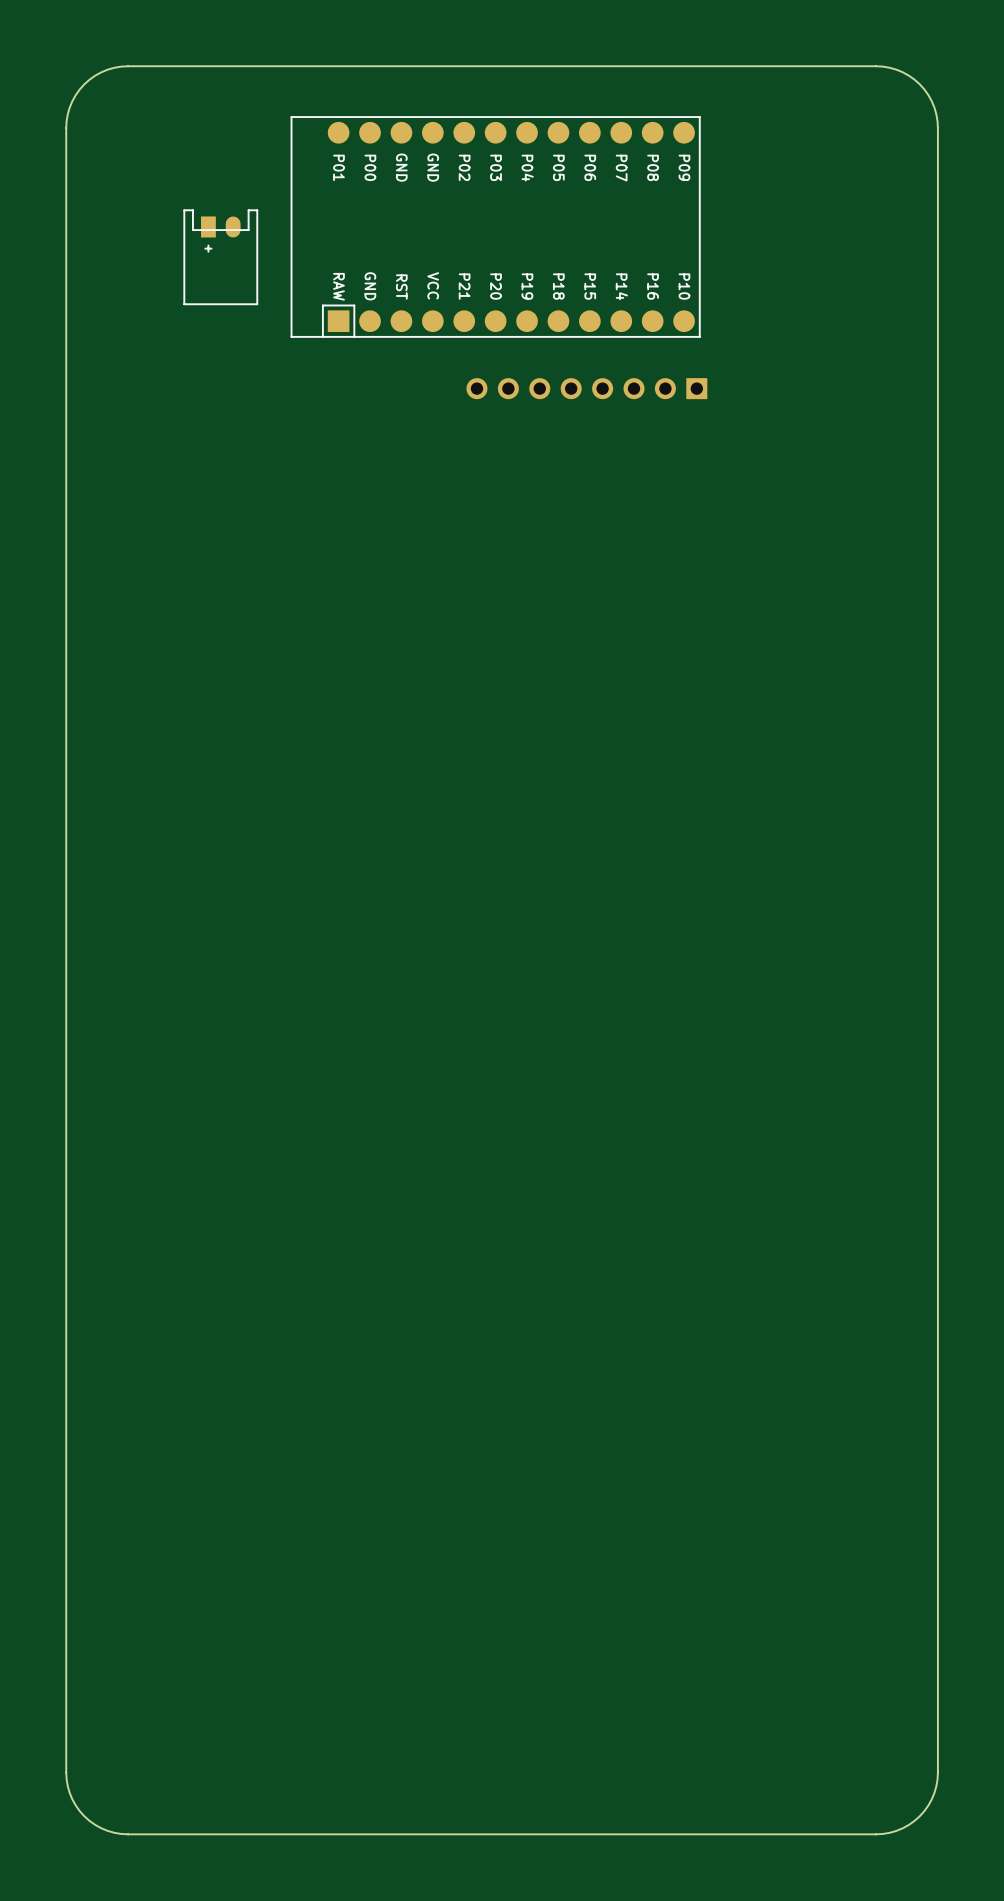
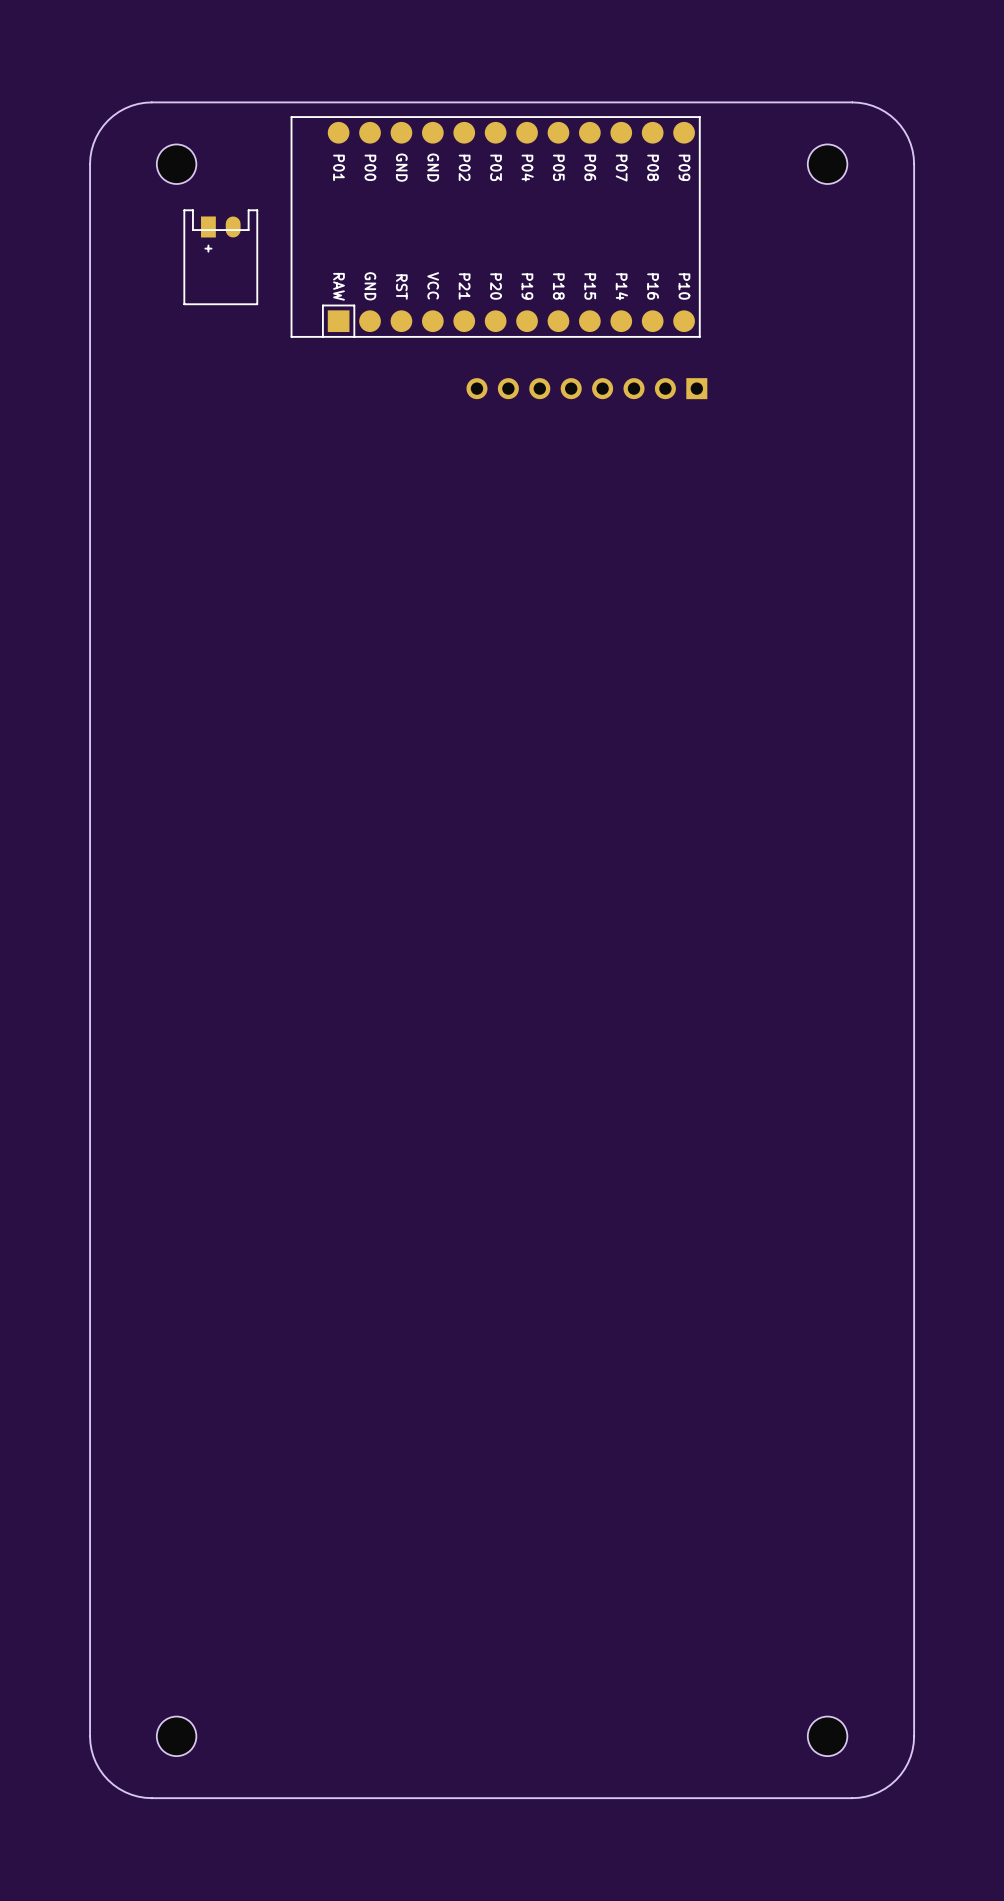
board edge: (876, 66) (128, 66) (107, 69) (95, 75) (79, 89) (72, 101) (67, 114) (66, 128) (66, 1772) (69, 1792) (75, 1805) (84, 1816) (101, 1828) (114, 1832) (128, 1834) (876, 1834) (889, 1832) (908, 1824) (919, 1816) (931, 1799) (936, 1786) (937, 1772) (937, 128) (934, 107) (928, 95) (919, 84) (908, 75) (896, 69) (876, 66) -> (852, 102) (872, 105) (885, 111) (896, 120) (904, 131) (910, 143) (914, 164) (914, 1736) (912, 1750) (908, 1763) (900, 1774) (885, 1788) (872, 1794) (852, 1798) (151, 1798) (138, 1796) (125, 1792) (113, 1784) (99, 1769) (91, 1750) (90, 1736) (90, 164) (91, 150) (96, 137) (103, 125) (118, 111) (131, 105) (151, 102) (852, 102)
part: none -> (176, 164)
part: none -> (827, 164)
part: none -> (176, 1736)
part: none -> (827, 1736)

